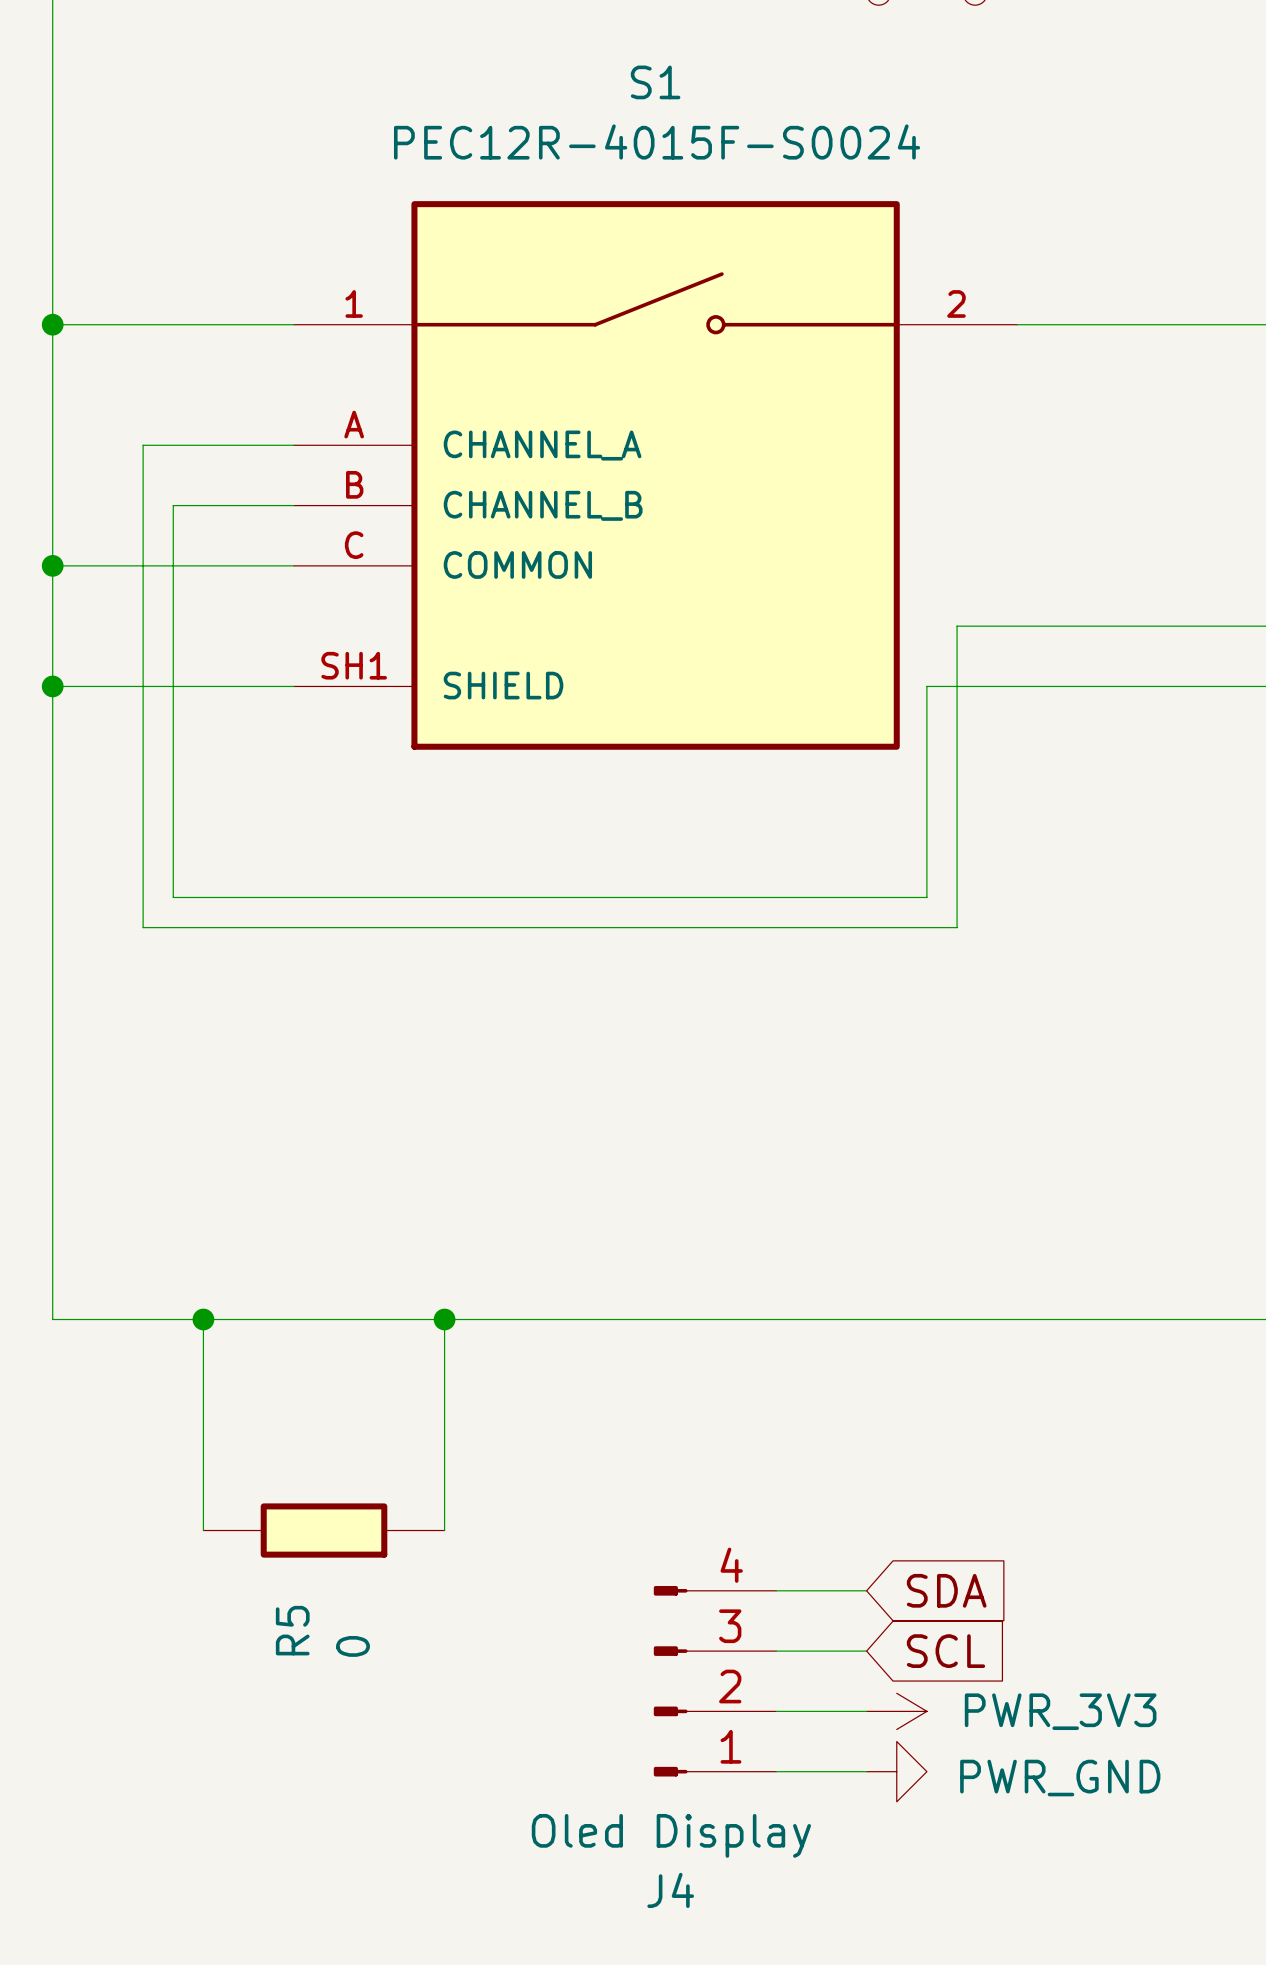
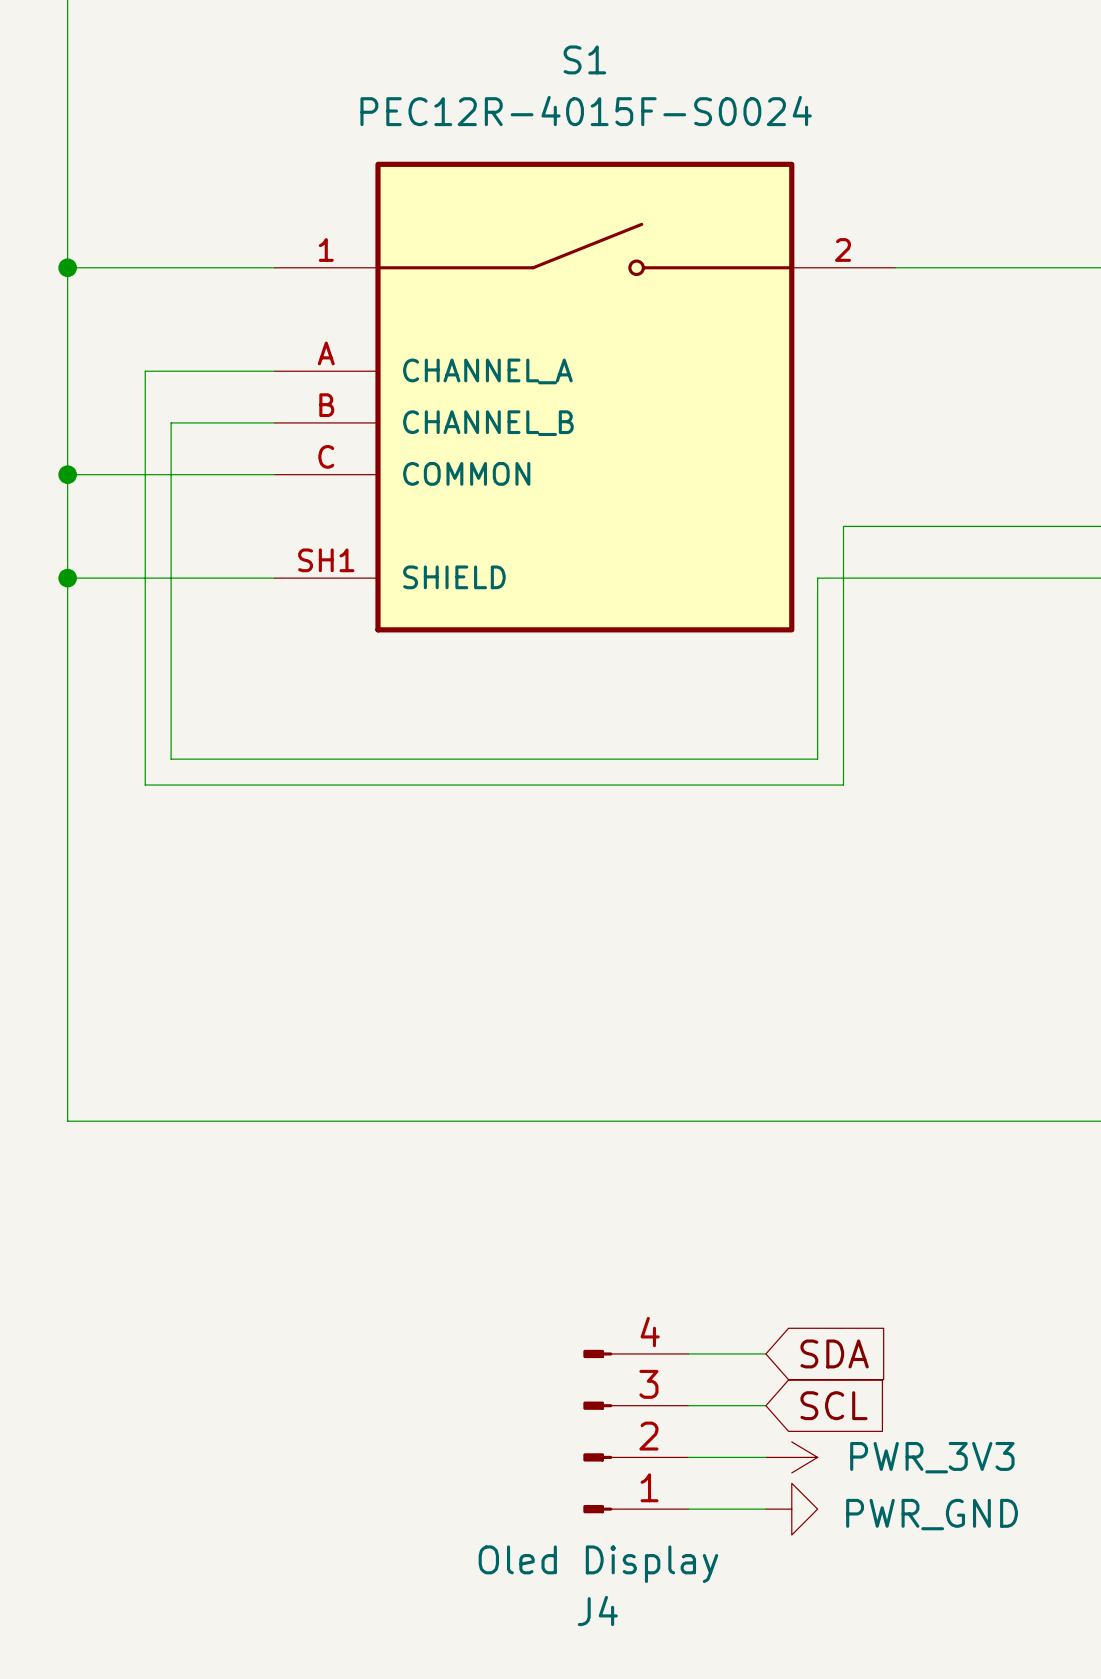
wire: (203, 1319) (203, 1530) -> none
junction: (203, 1319) -> none
wire: (444, 1319) (444, 1530) -> none
junction: (444, 1319) -> none
R5: 0 (324, 1530) -> none

